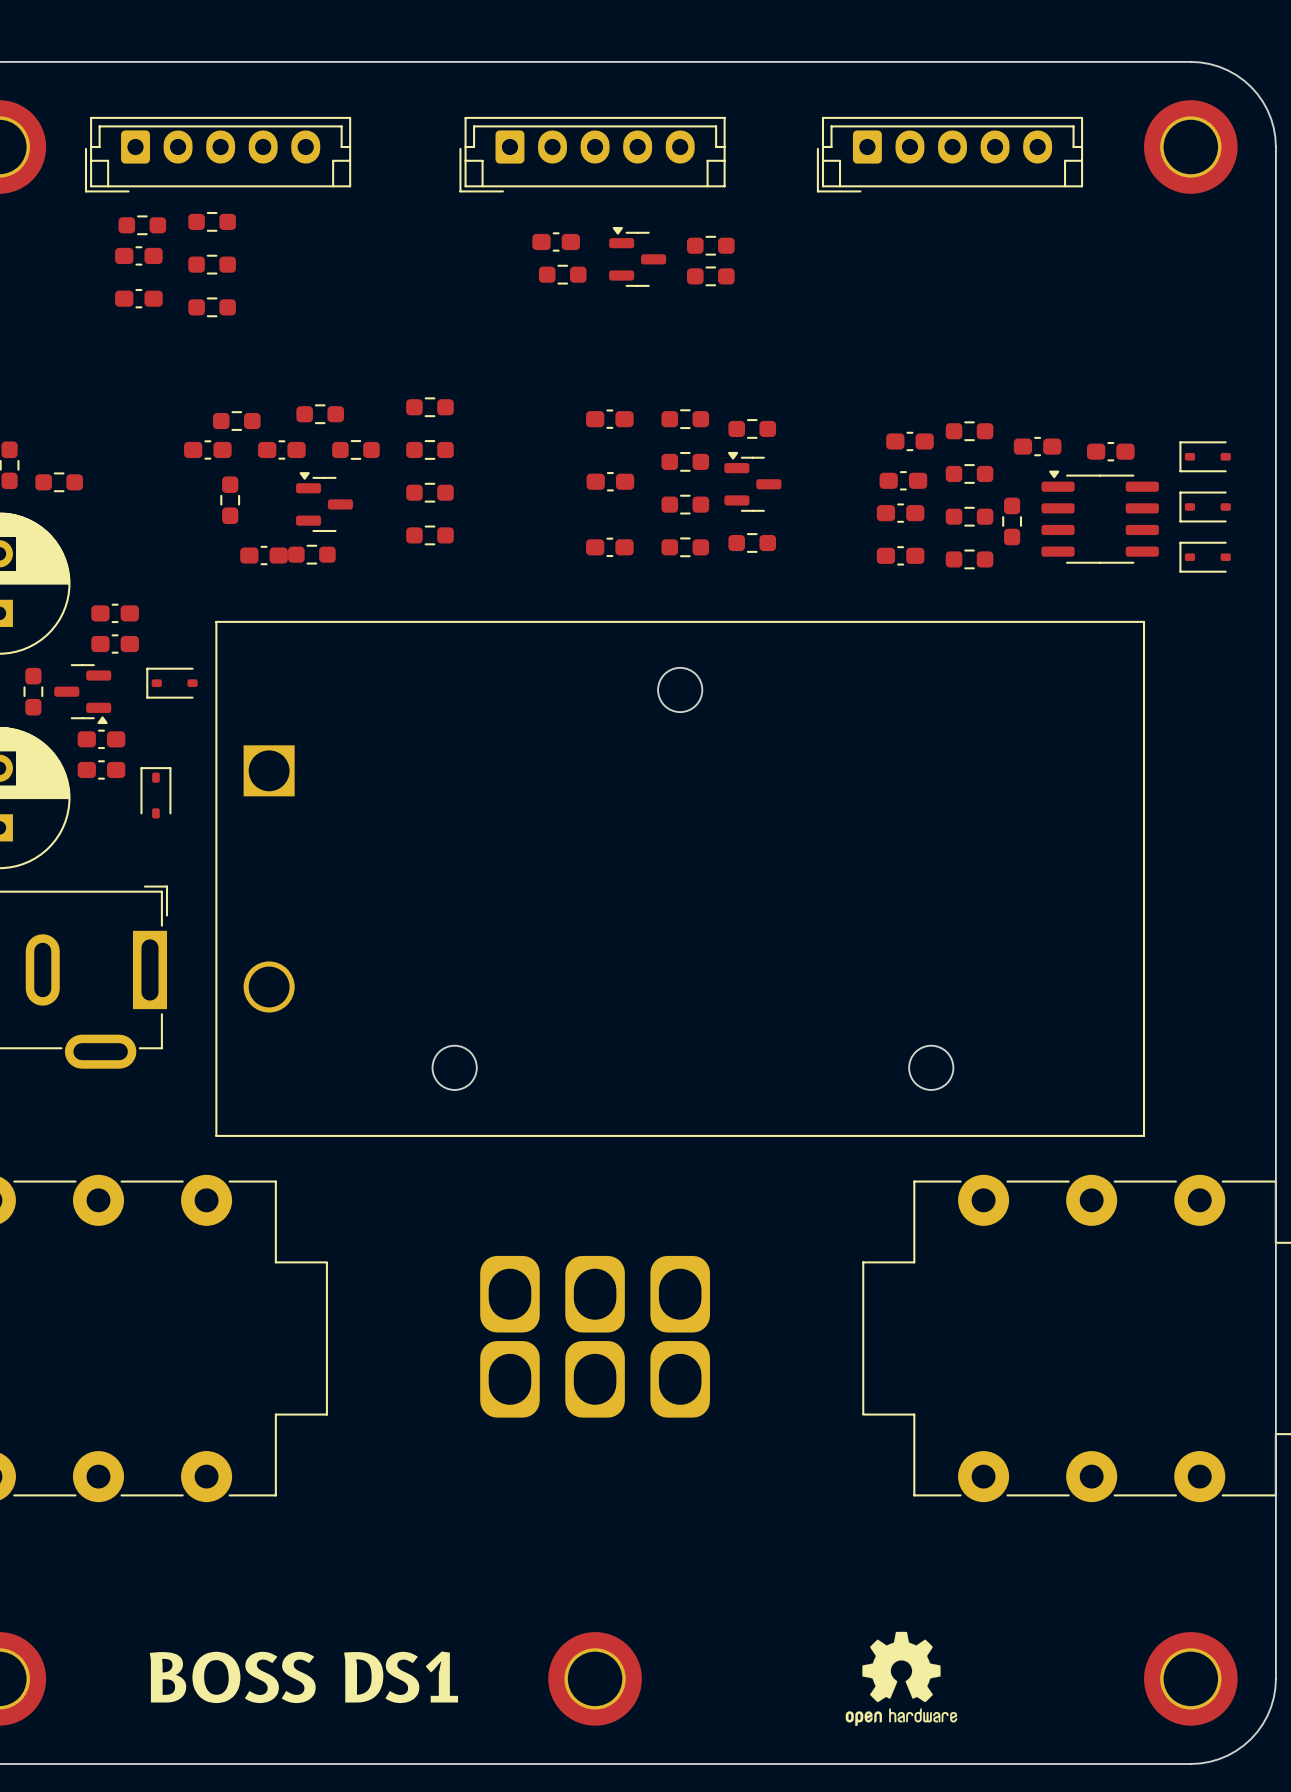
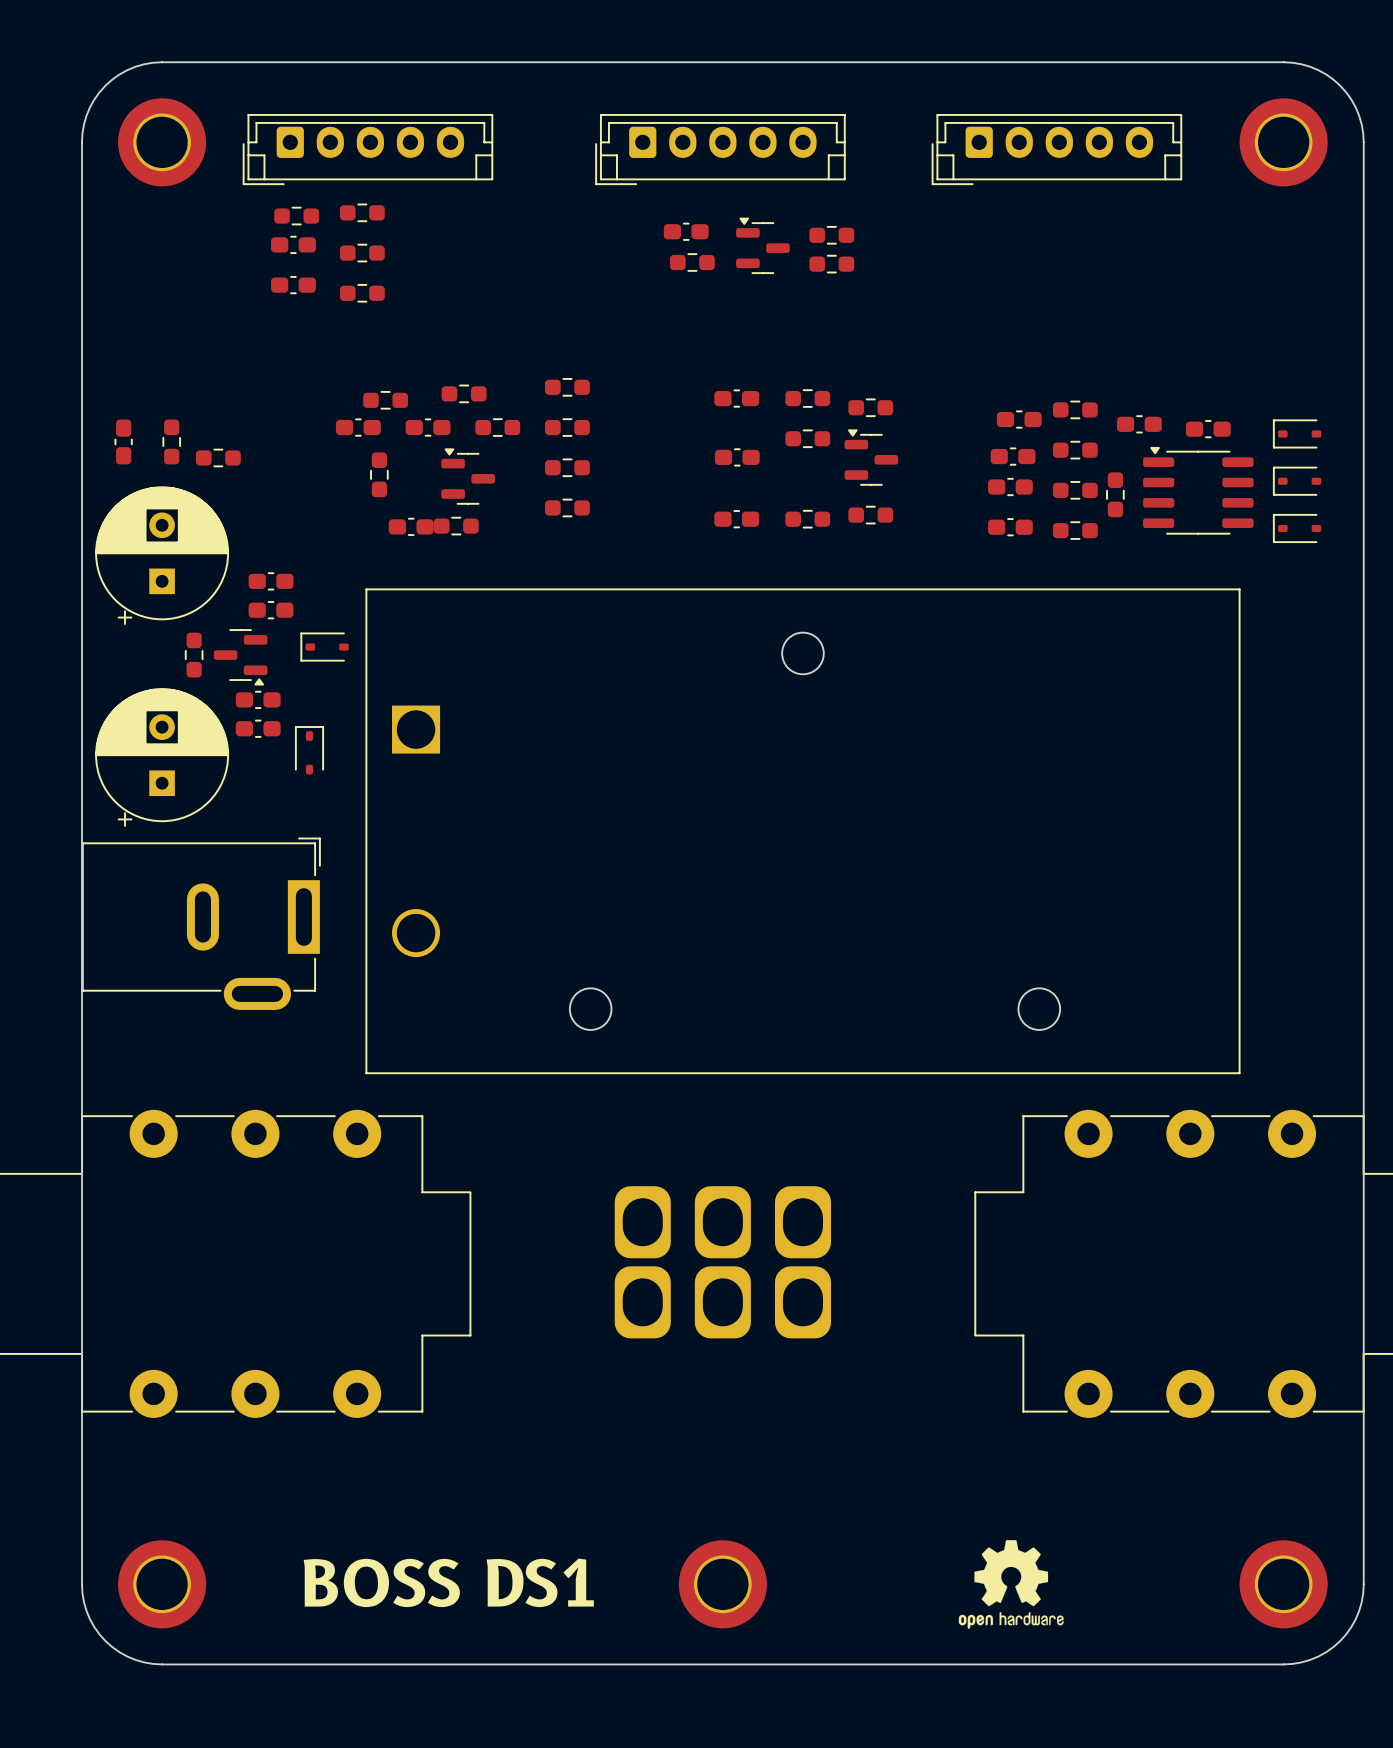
part: (685, 504) -> none

